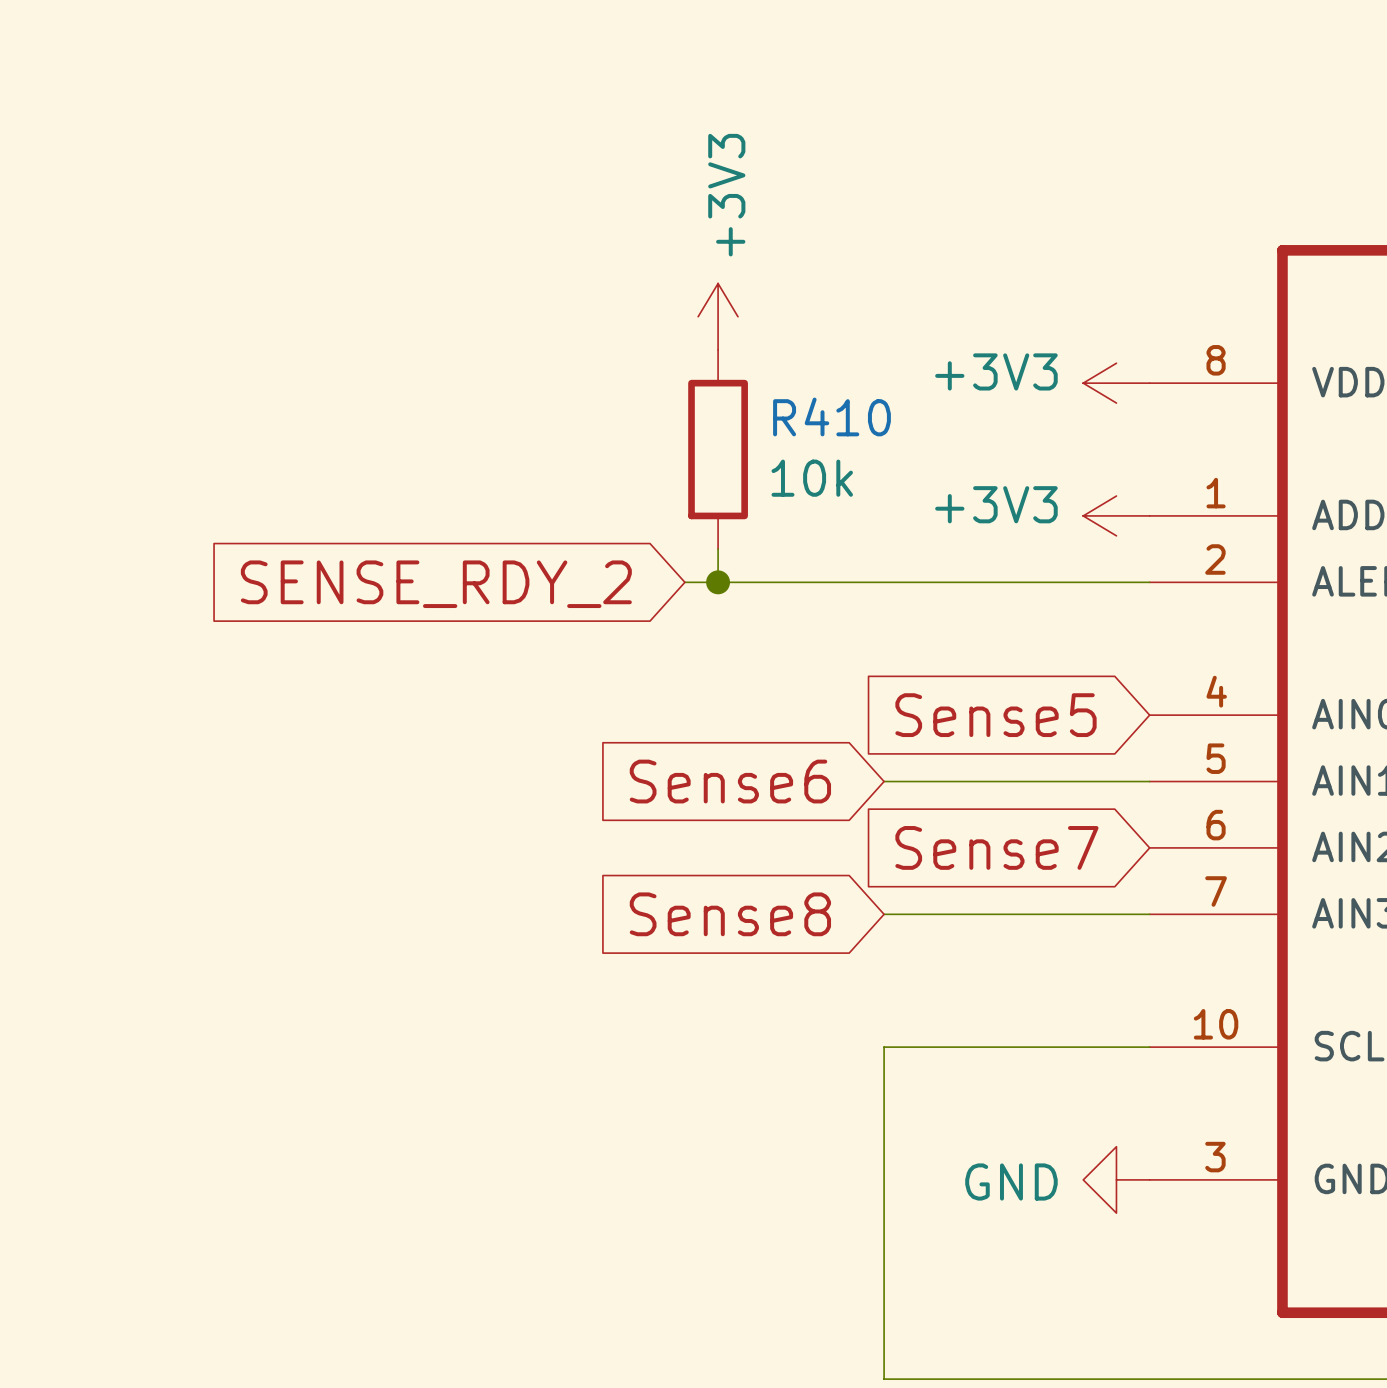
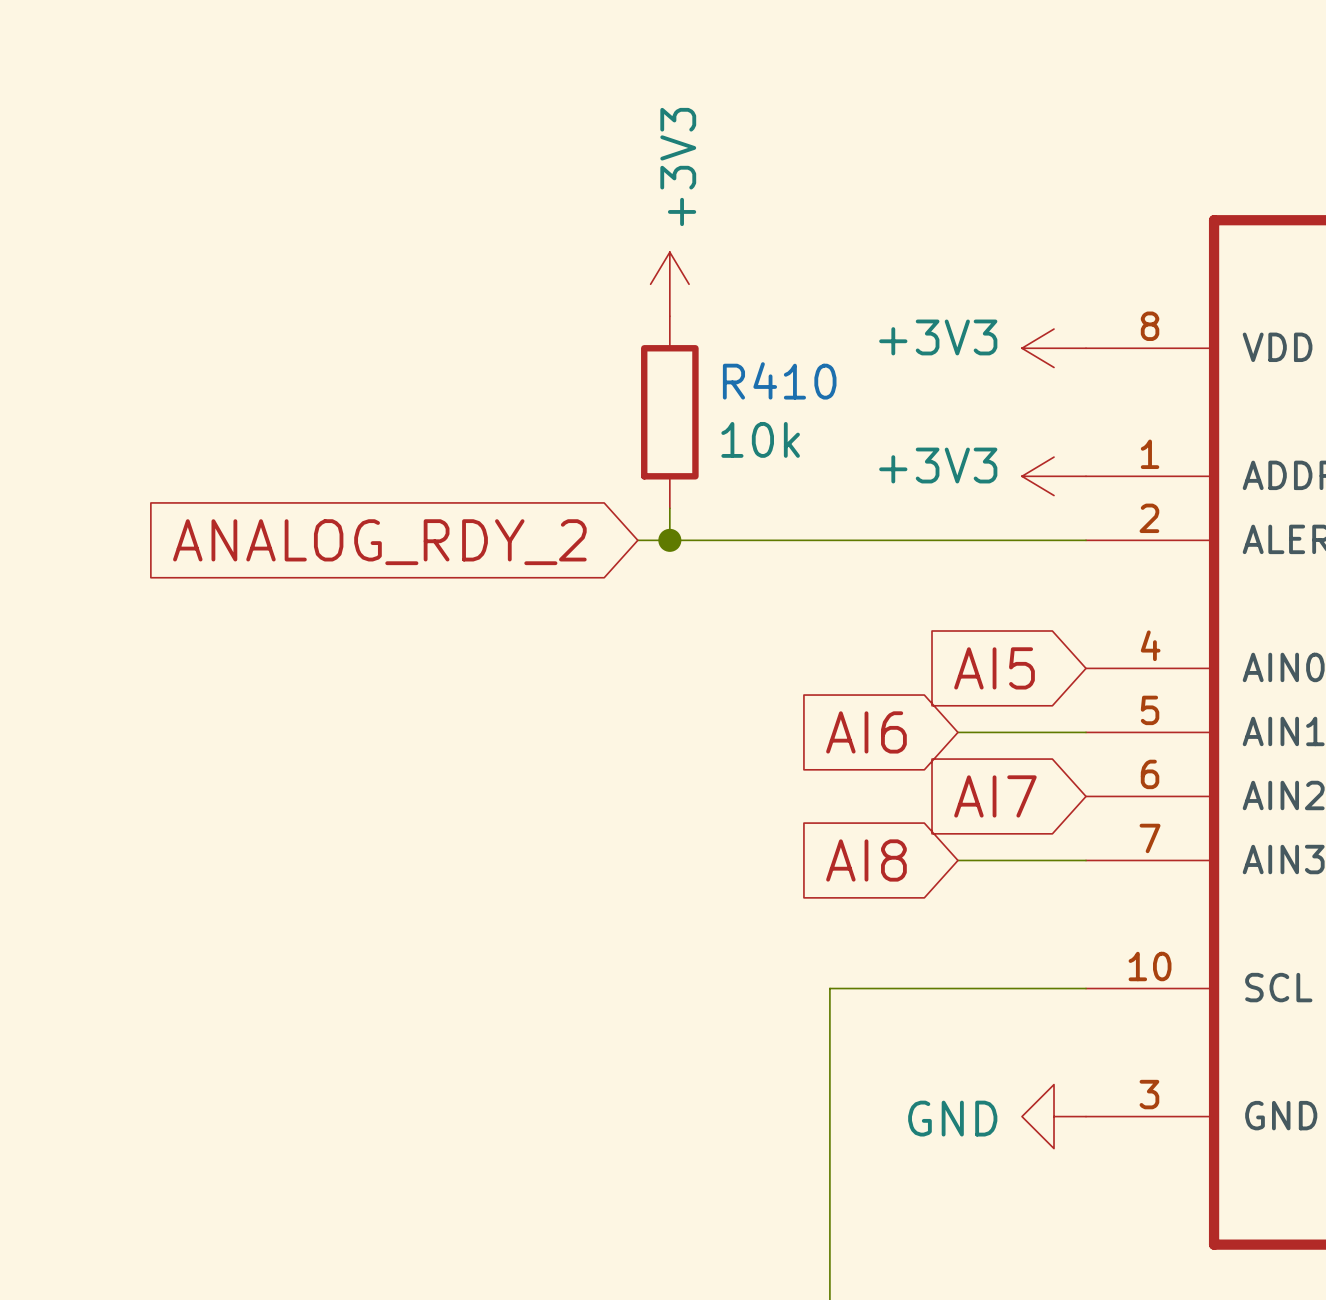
global label: SENSE_RDY_2 (436, 584) -> ANALOG_RDY_2 (379, 542)
global label: Sense5 (995, 715) -> AI5 (994, 668)
global label: Sense6 (730, 781) -> none
wire: (884, 781) (1016, 781) -> none
global label: none -> AI6 (866, 732)
global label: Sense7 (996, 847) -> AI7 (995, 796)
global label: Sense8 (730, 914) -> none
wire: (884, 914) (1016, 914) -> none
global label: none -> AI8 (866, 860)

